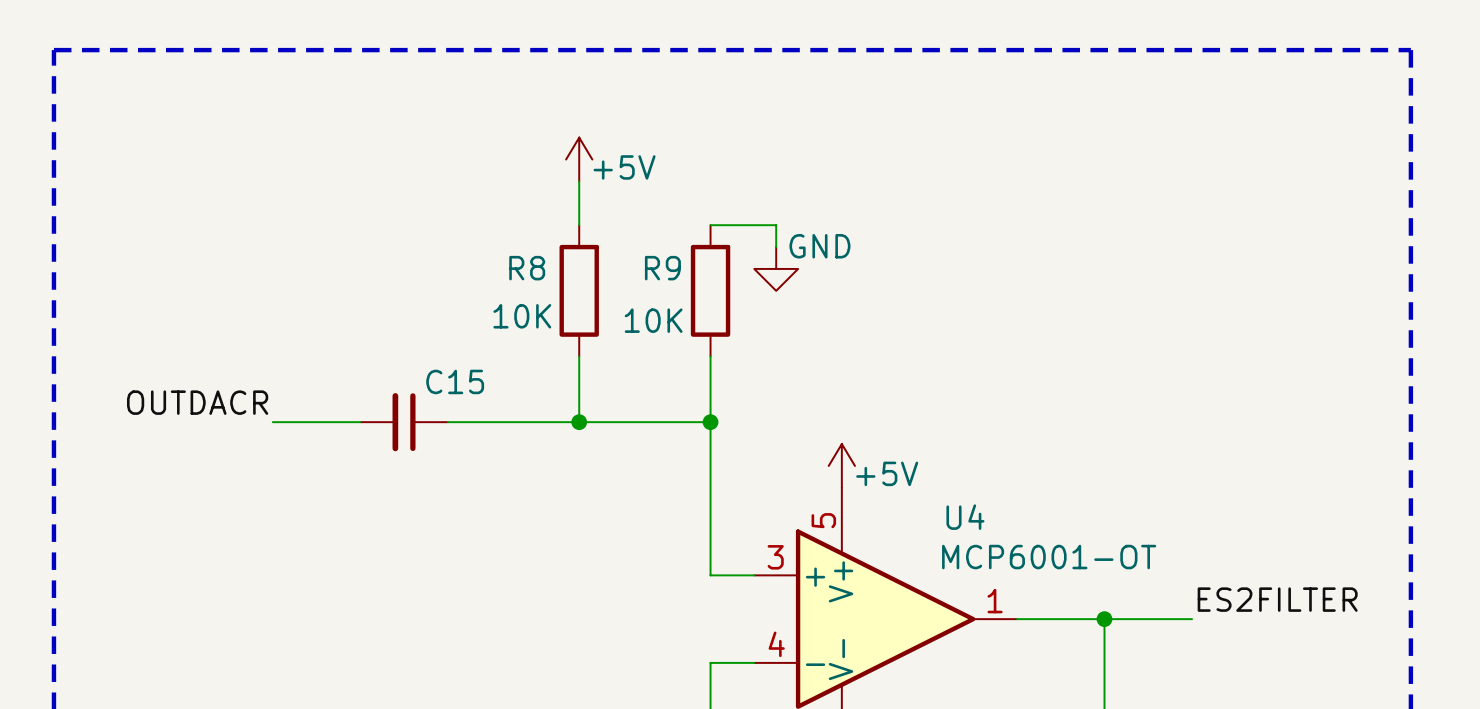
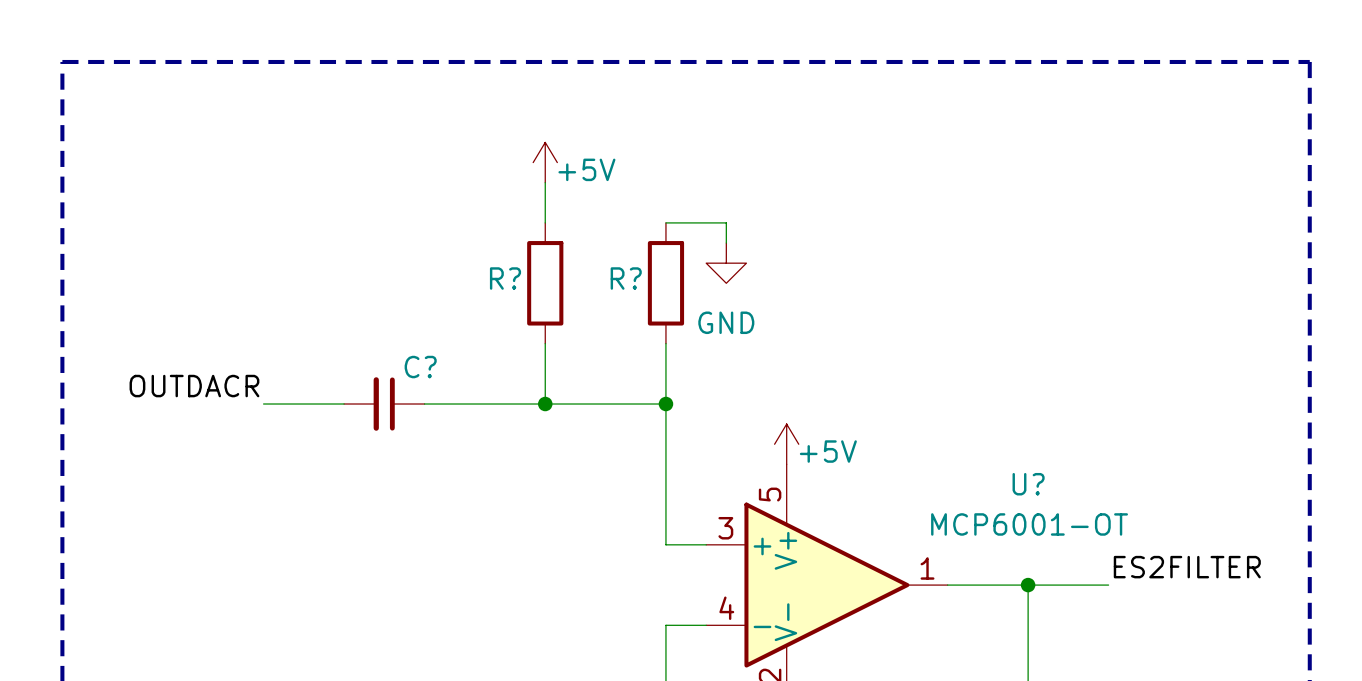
power symbol text position: GND (819, 246) -> GND (726, 322)
R8 name: R8 (527, 268) -> R? (505, 278)
R9 name: R9 (662, 268) -> R? (626, 278)
R8 value: 10K (522, 316) -> none
R9 value: 10K (653, 320) -> none
C15 name: C15 (455, 381) -> C? (420, 367)
U4 name: U4 (965, 517) -> U? (1028, 484)
U4 value position: MCP6001-OT (1049, 557) -> MCP6001-OT (1029, 524)

